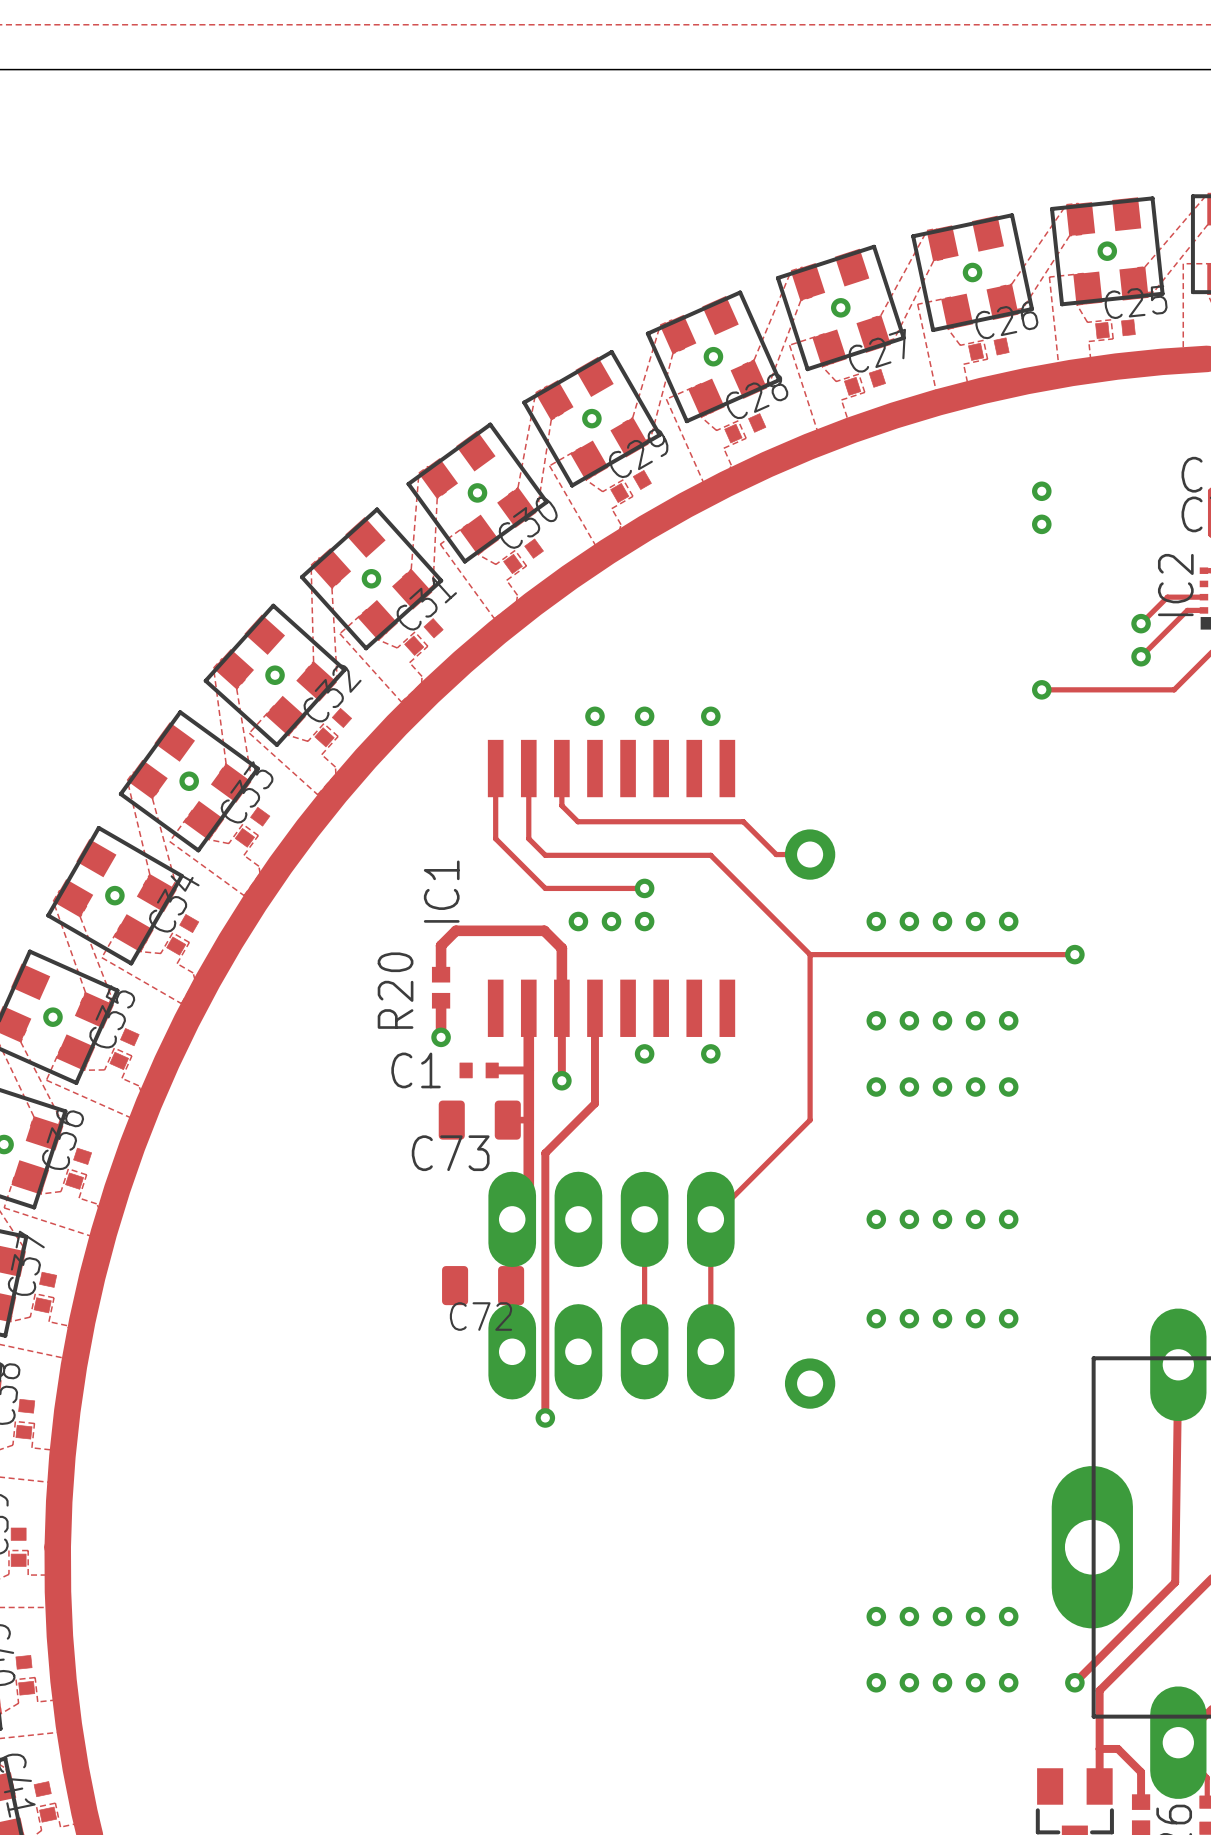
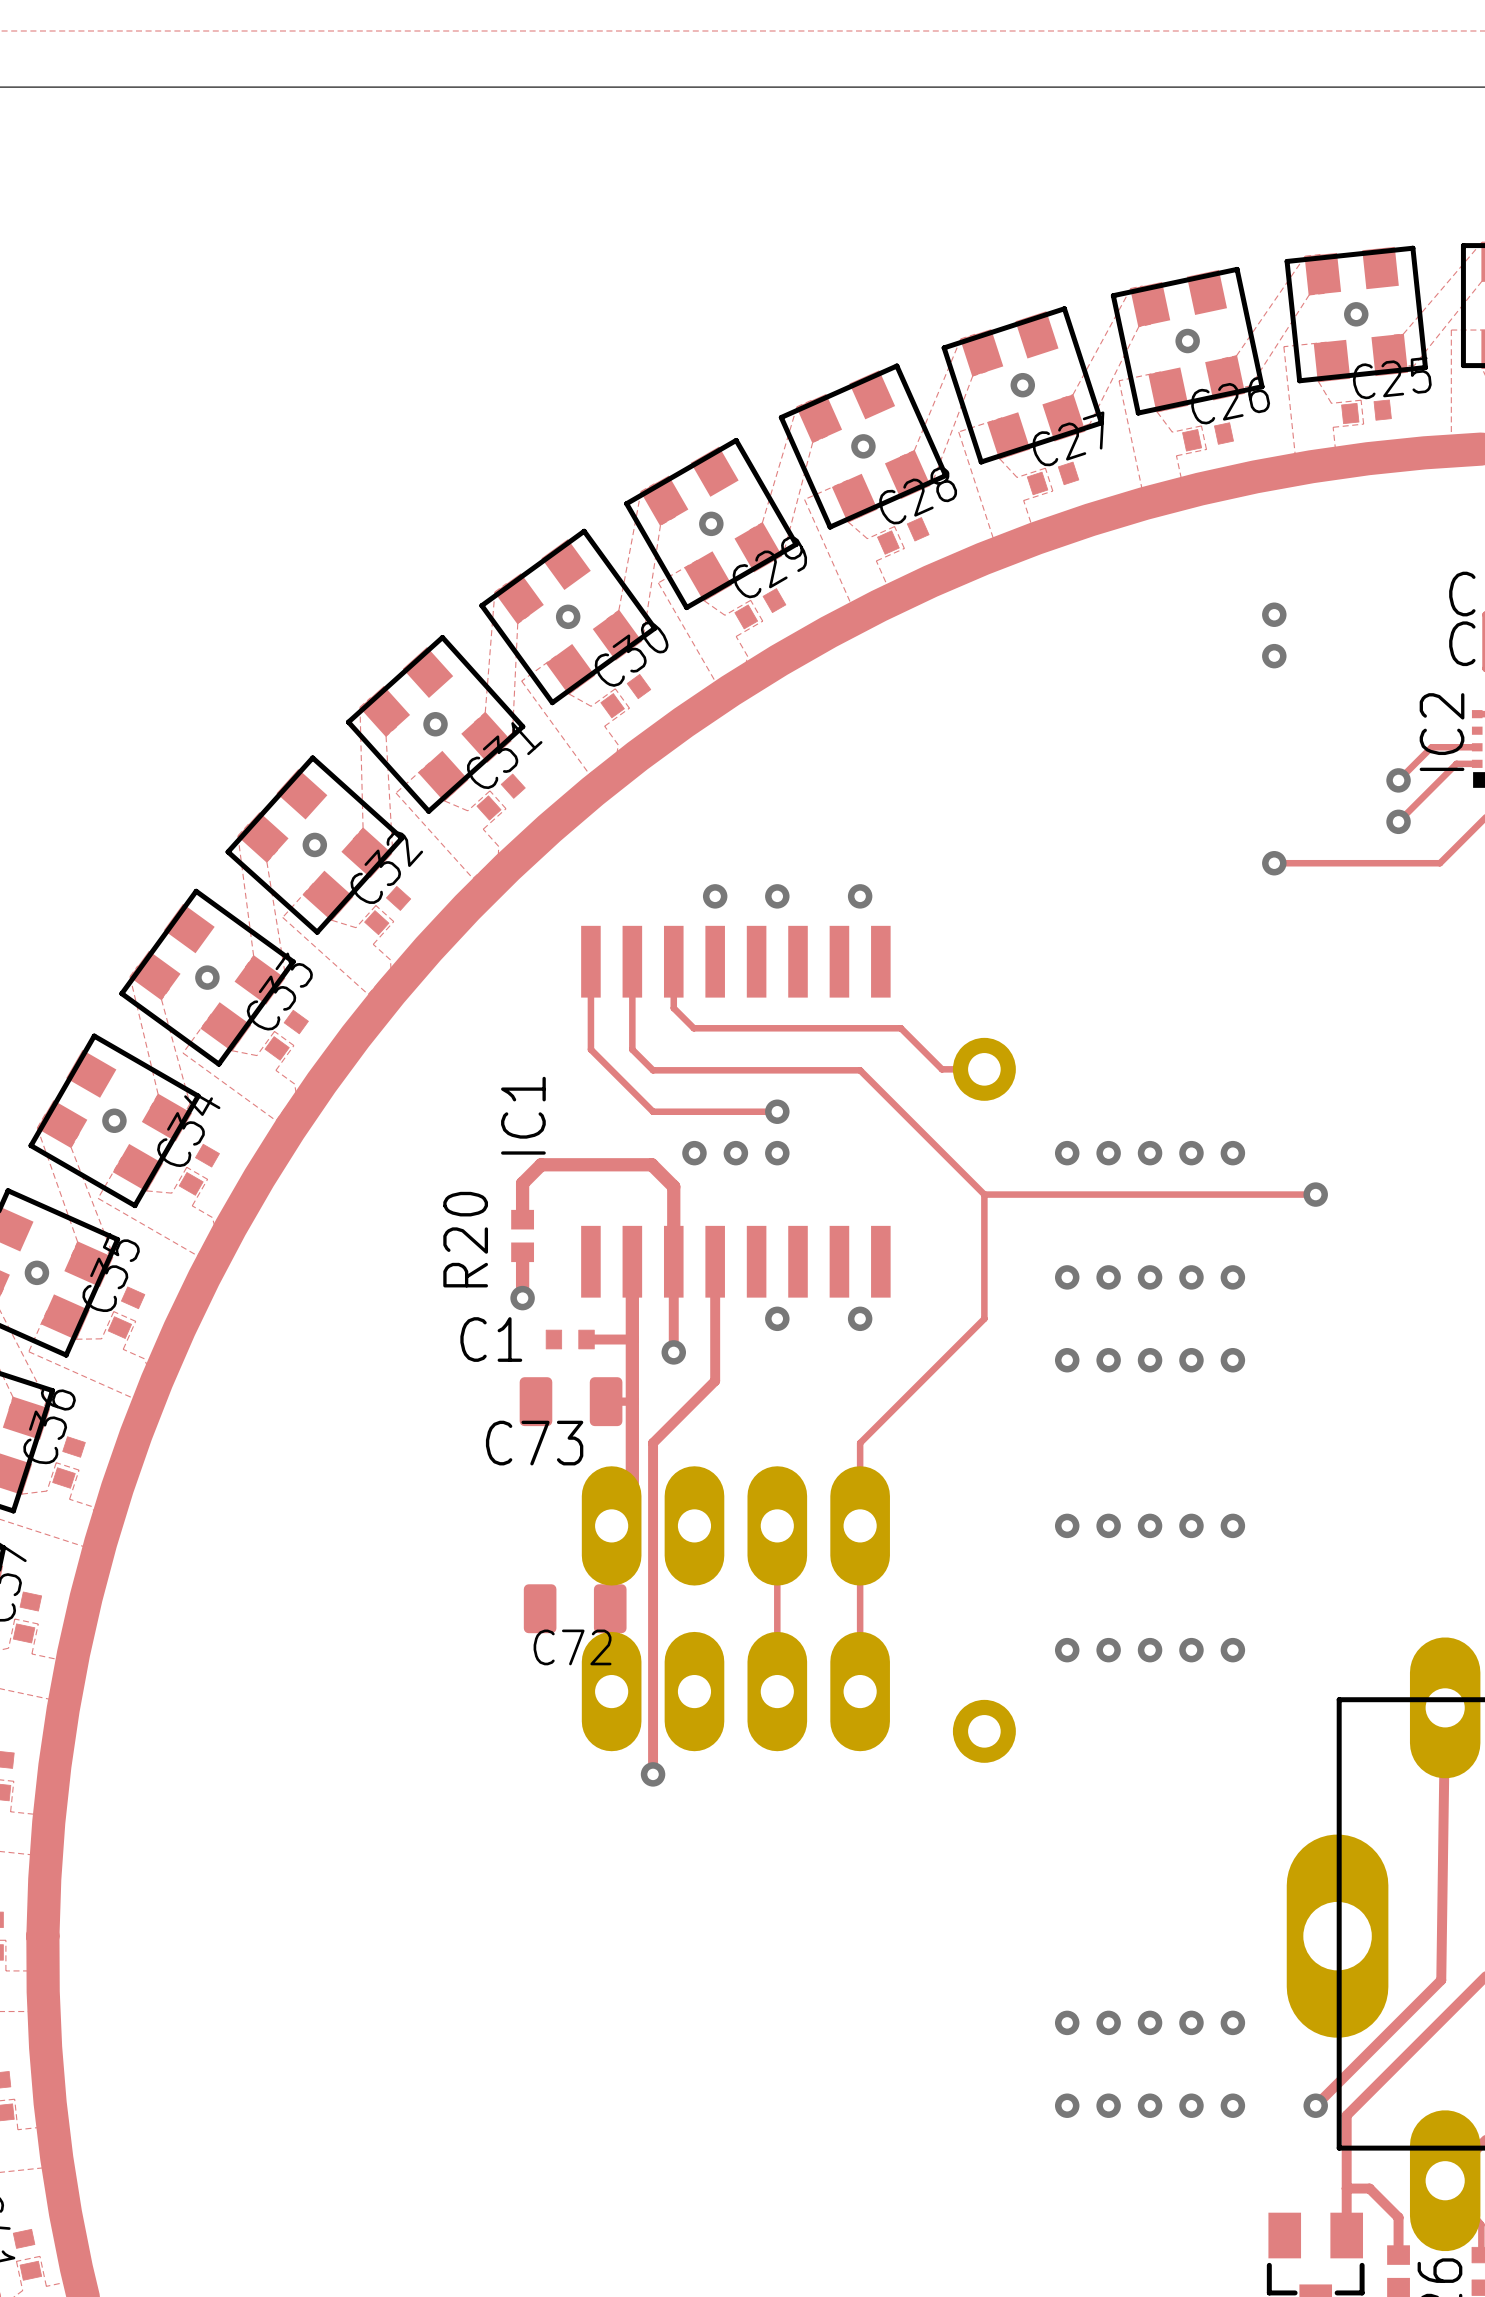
track: (810, 1053) (810, 1120) (710, 1219) -> (984, 1318) (860, 1443) (860, 1525)

